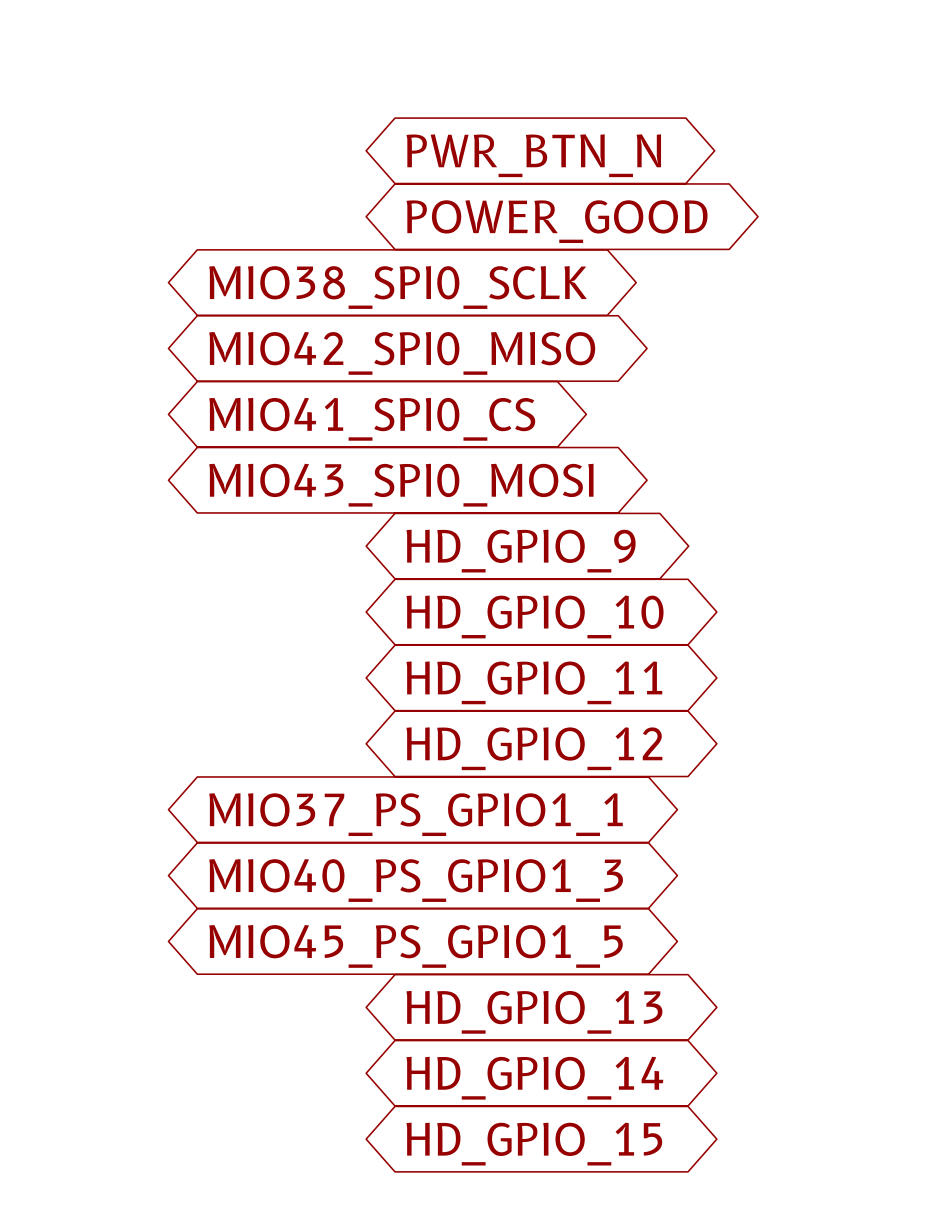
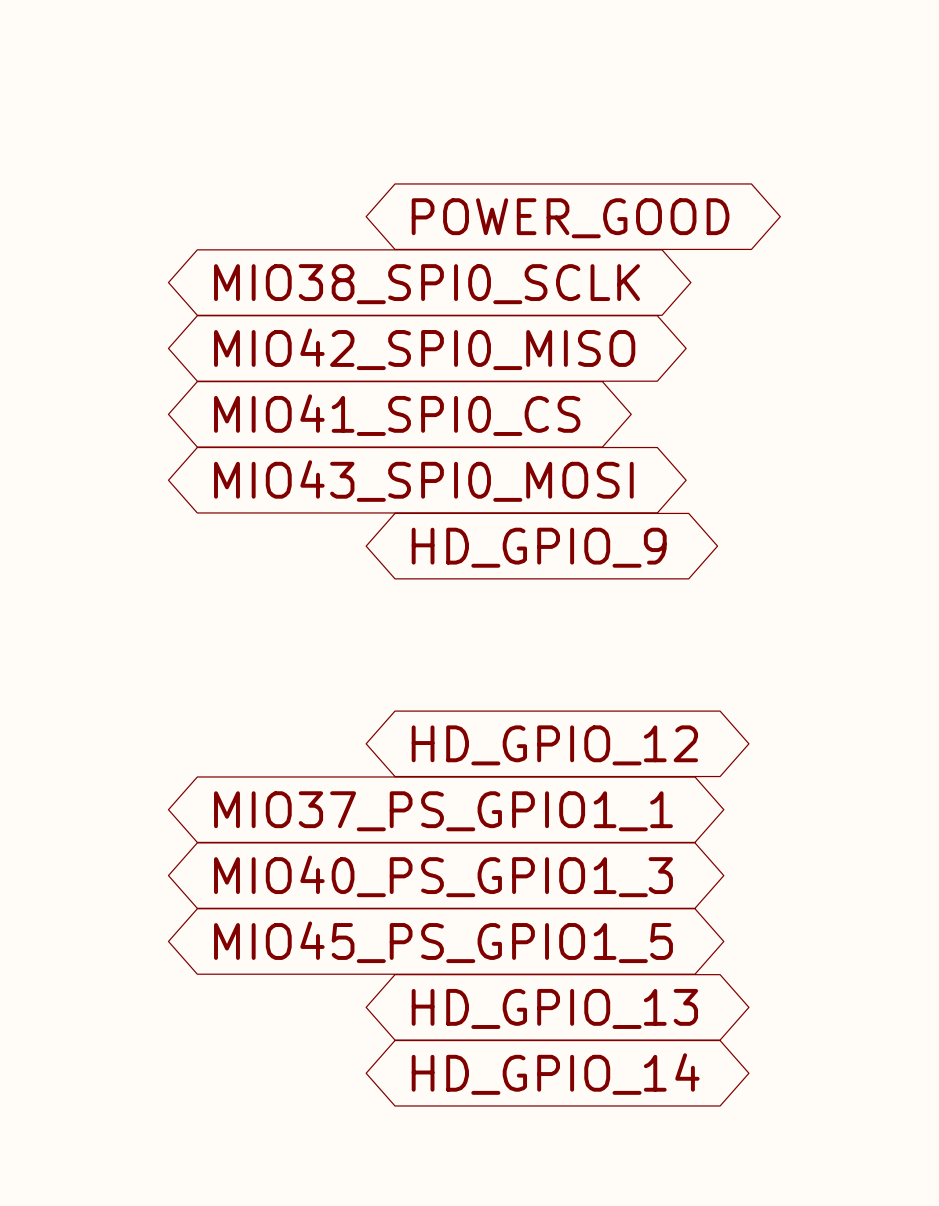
global label: PWR_BTN_N (533, 155) -> none
global label: HD_GPIO_10 (535, 616) -> none
global label: HD_GPIO_11 (534, 682) -> none
global label: HD_GPIO_15 (534, 1144) -> none

